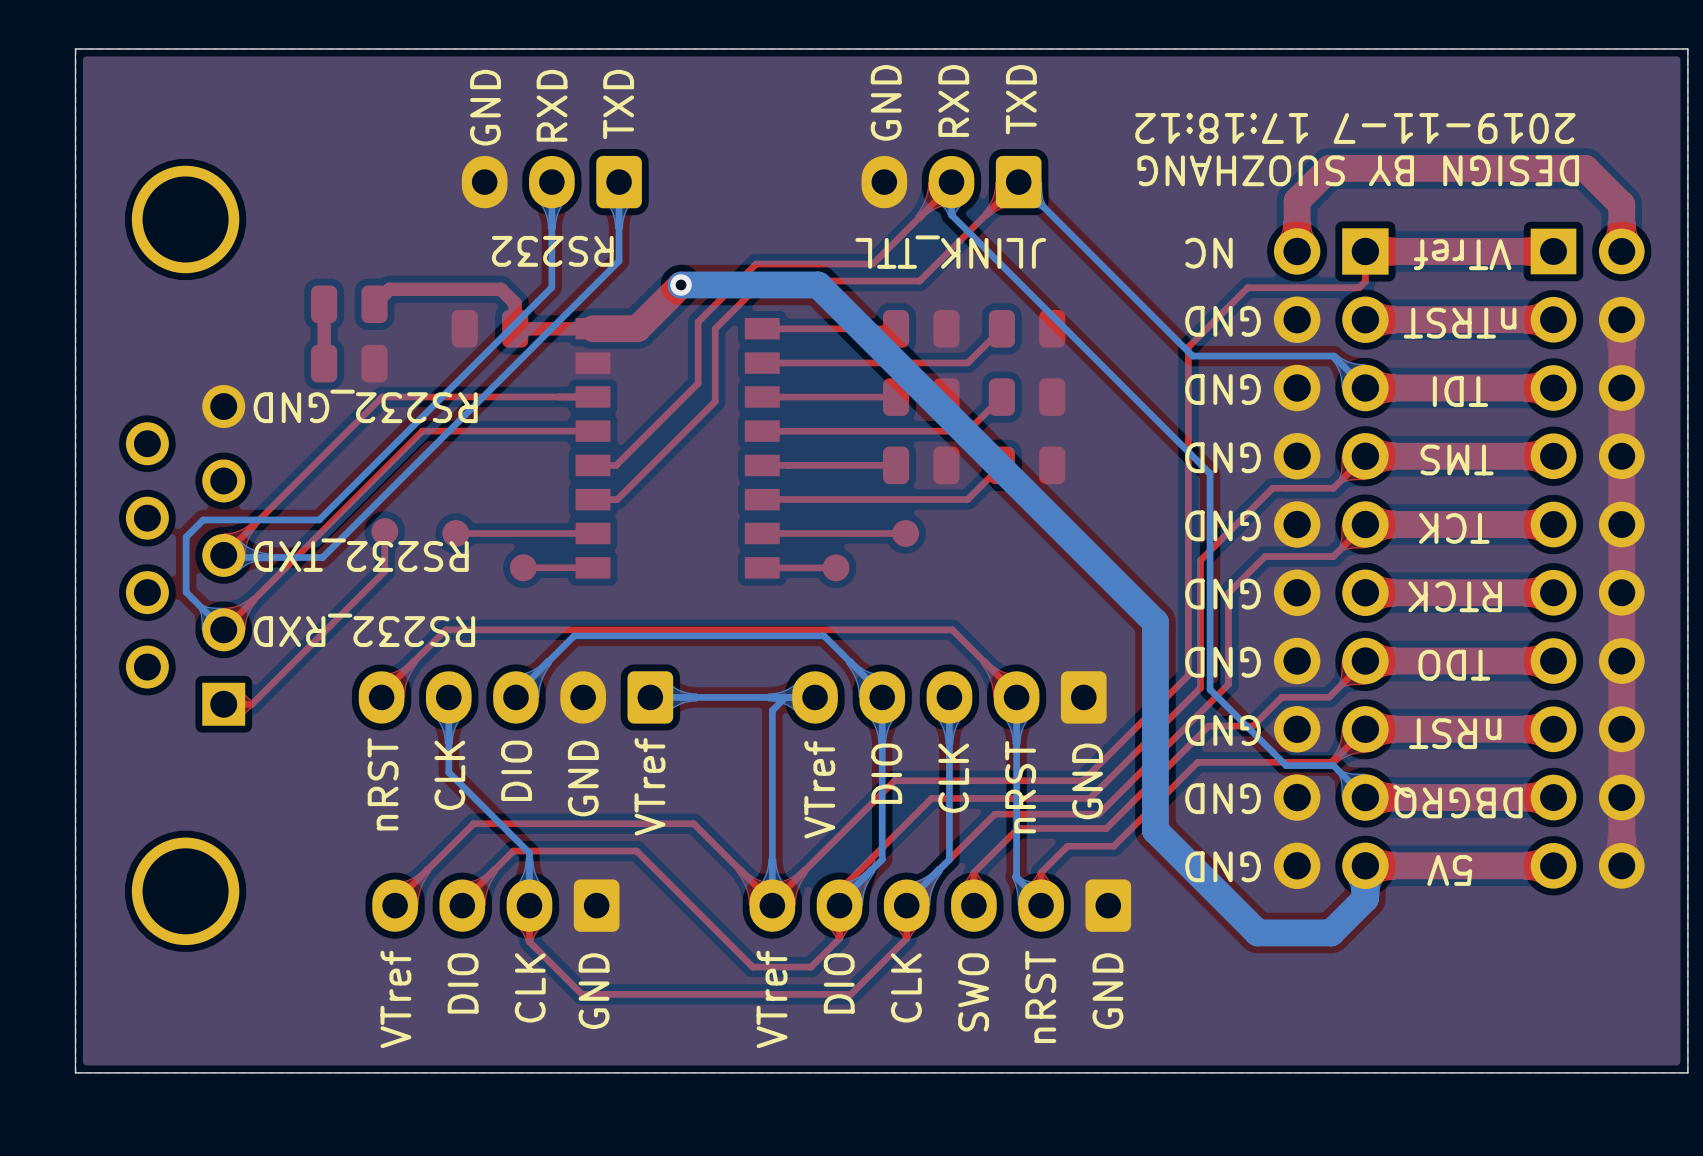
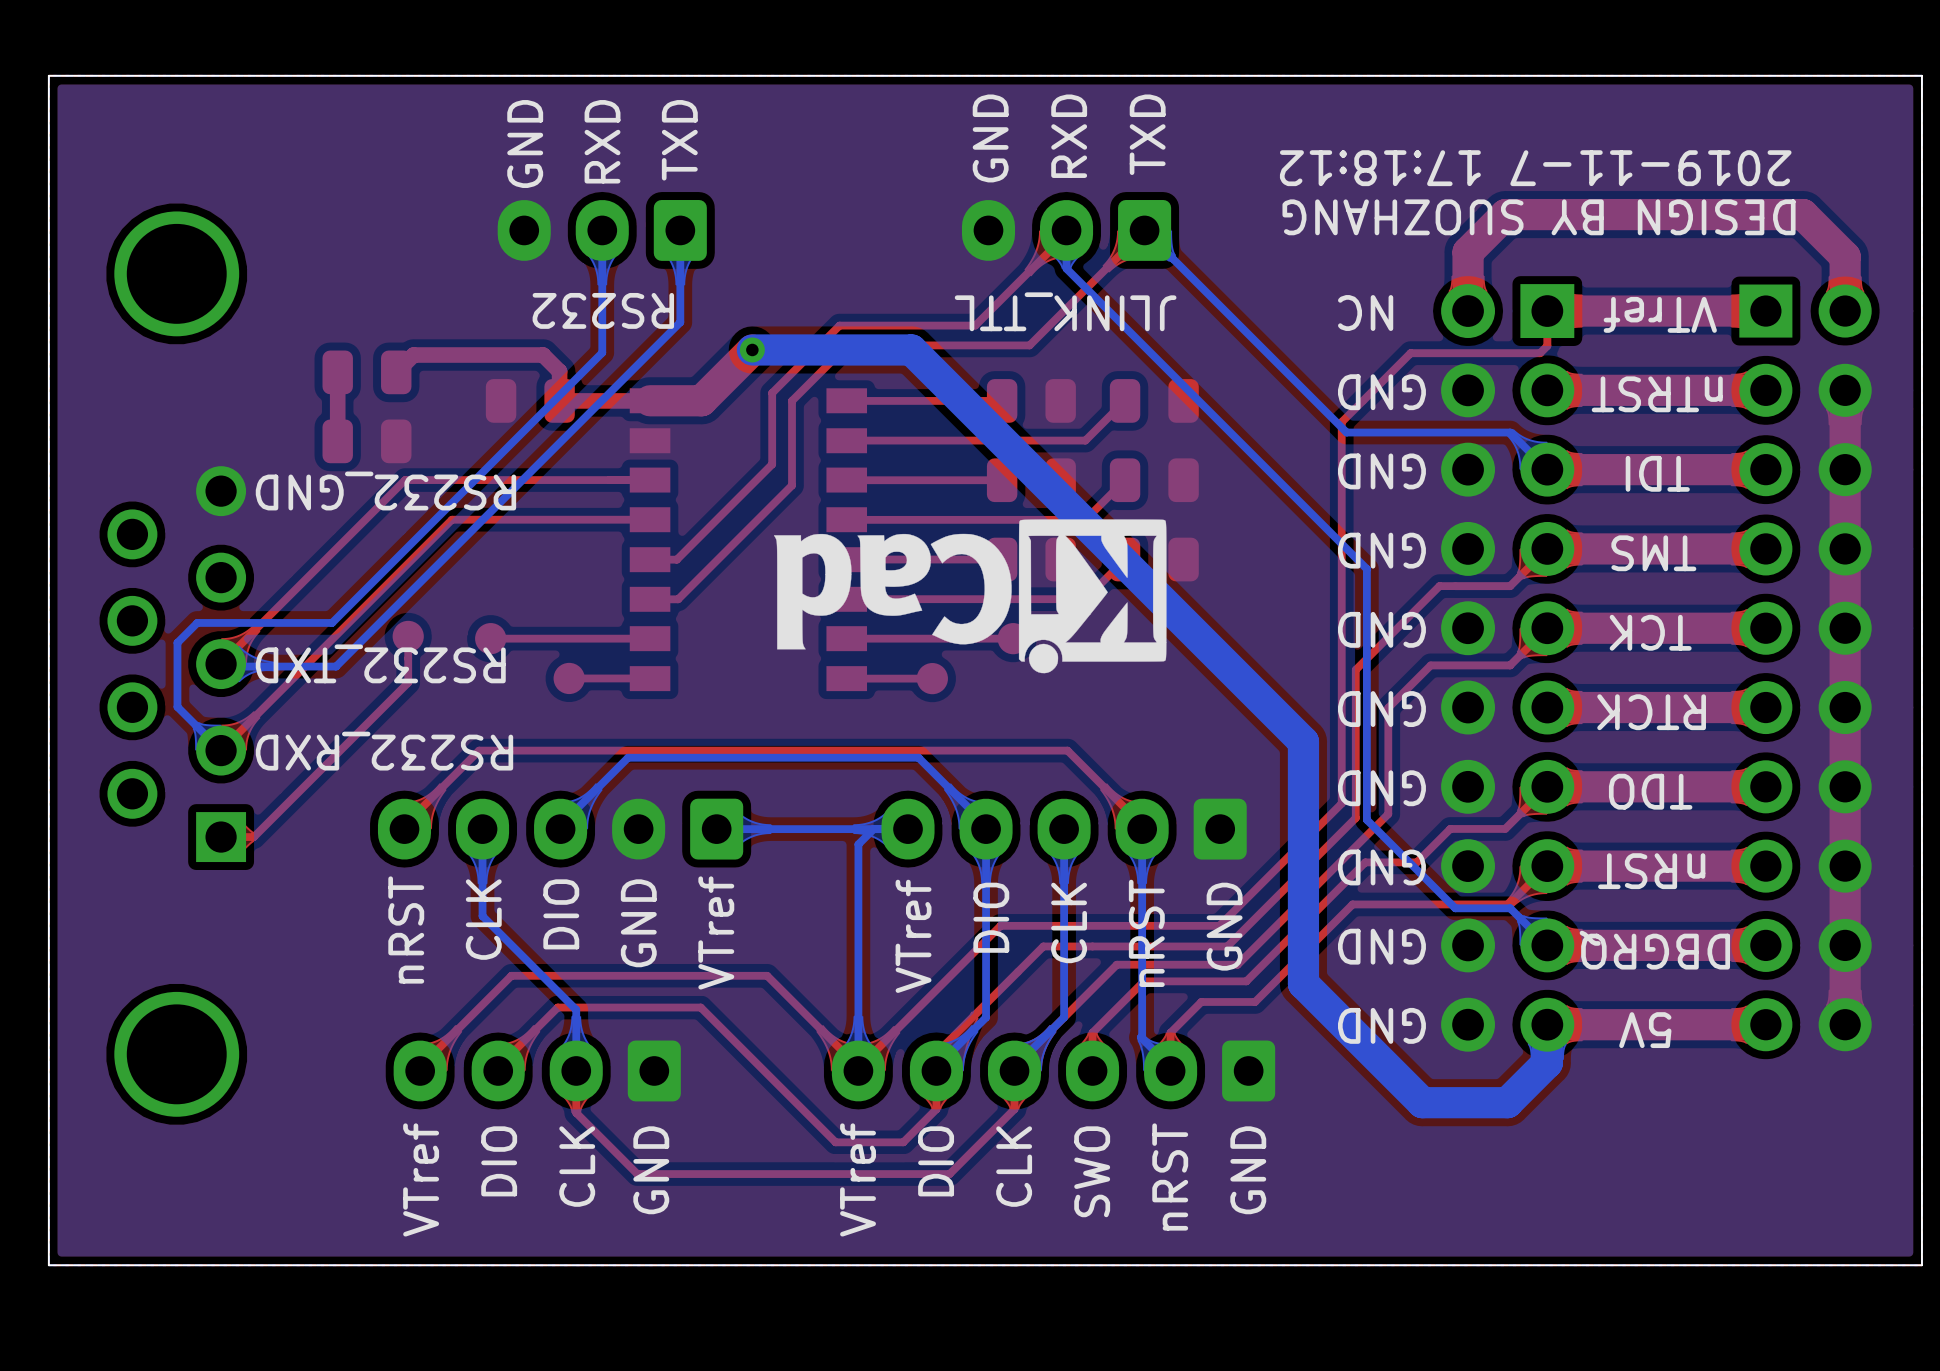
drawing: none -> [773, 519, 1167, 674]

